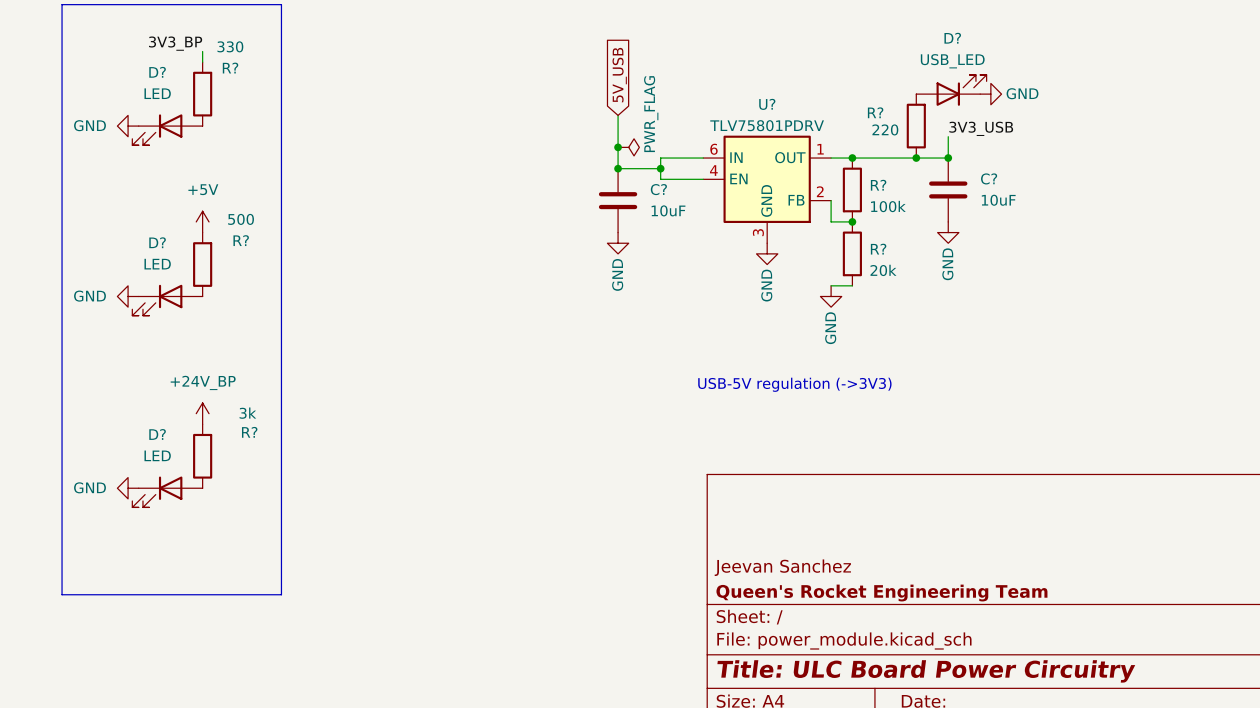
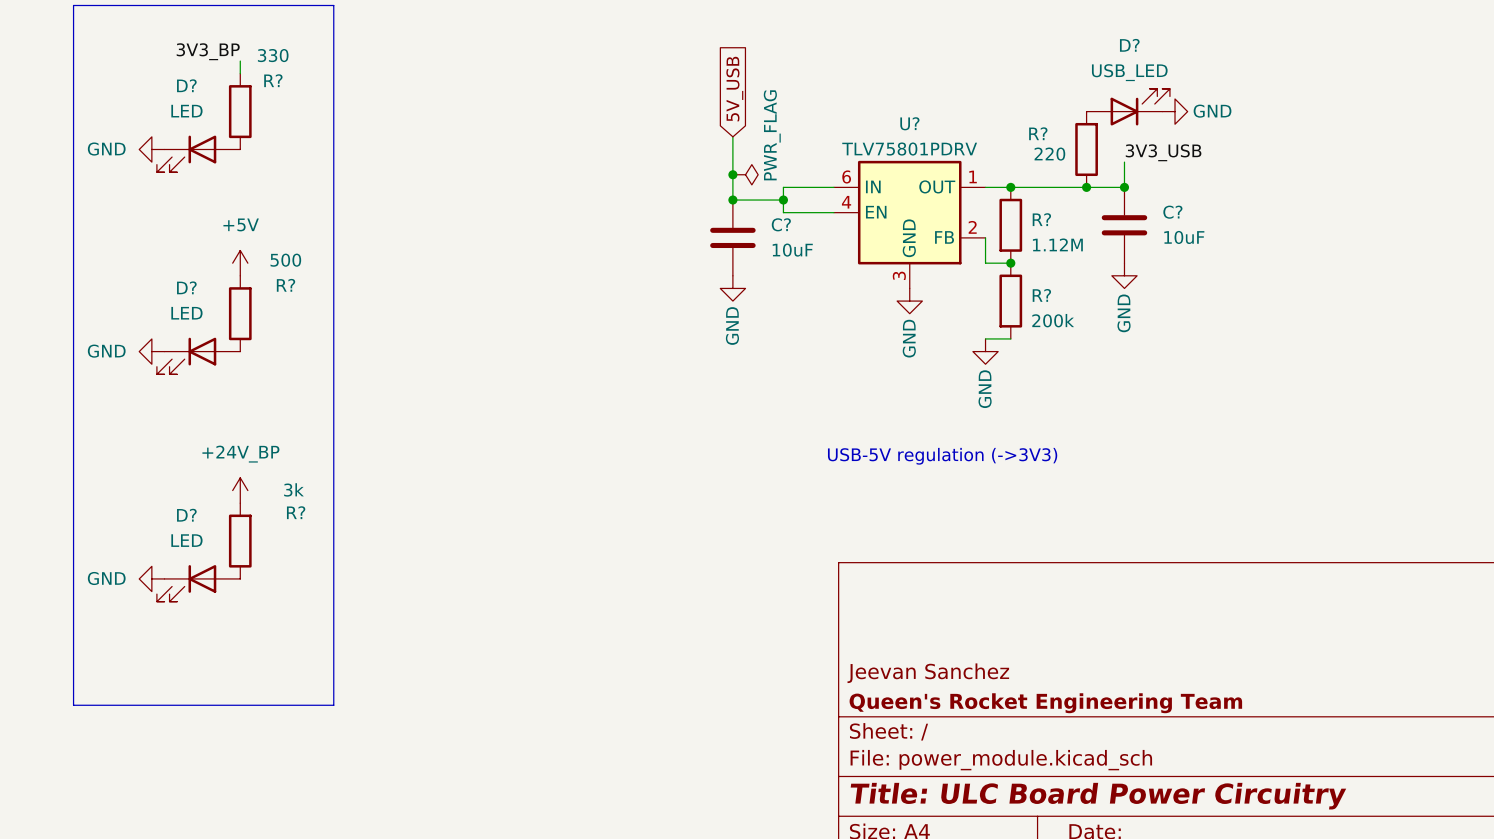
R? value: 100k (888, 206) -> 1.12M (1057, 244)
R? value: 20k (883, 270) -> 200k (1053, 320)

